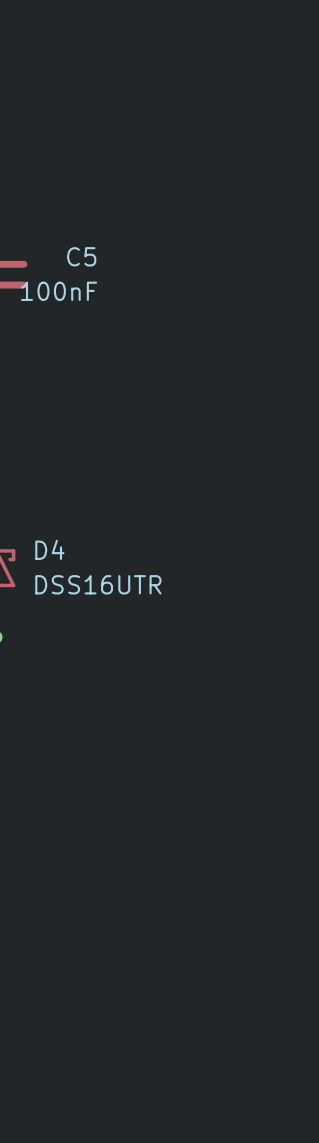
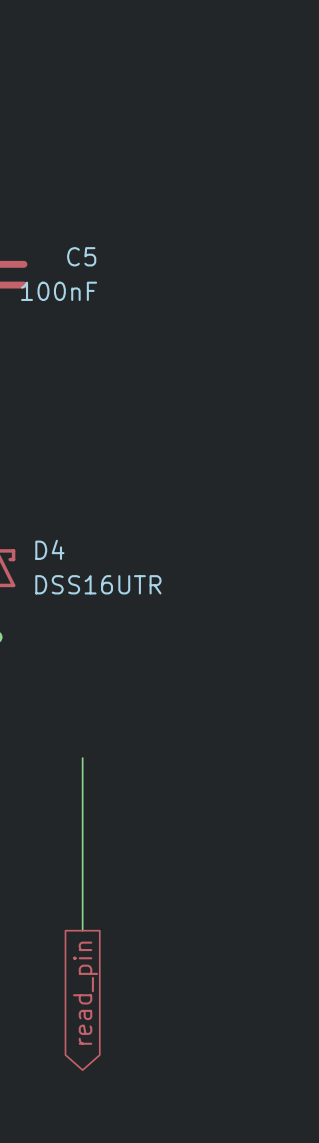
wire: none -> (82, 758) (82, 930)
global label: none -> read_pin (85, 993)

